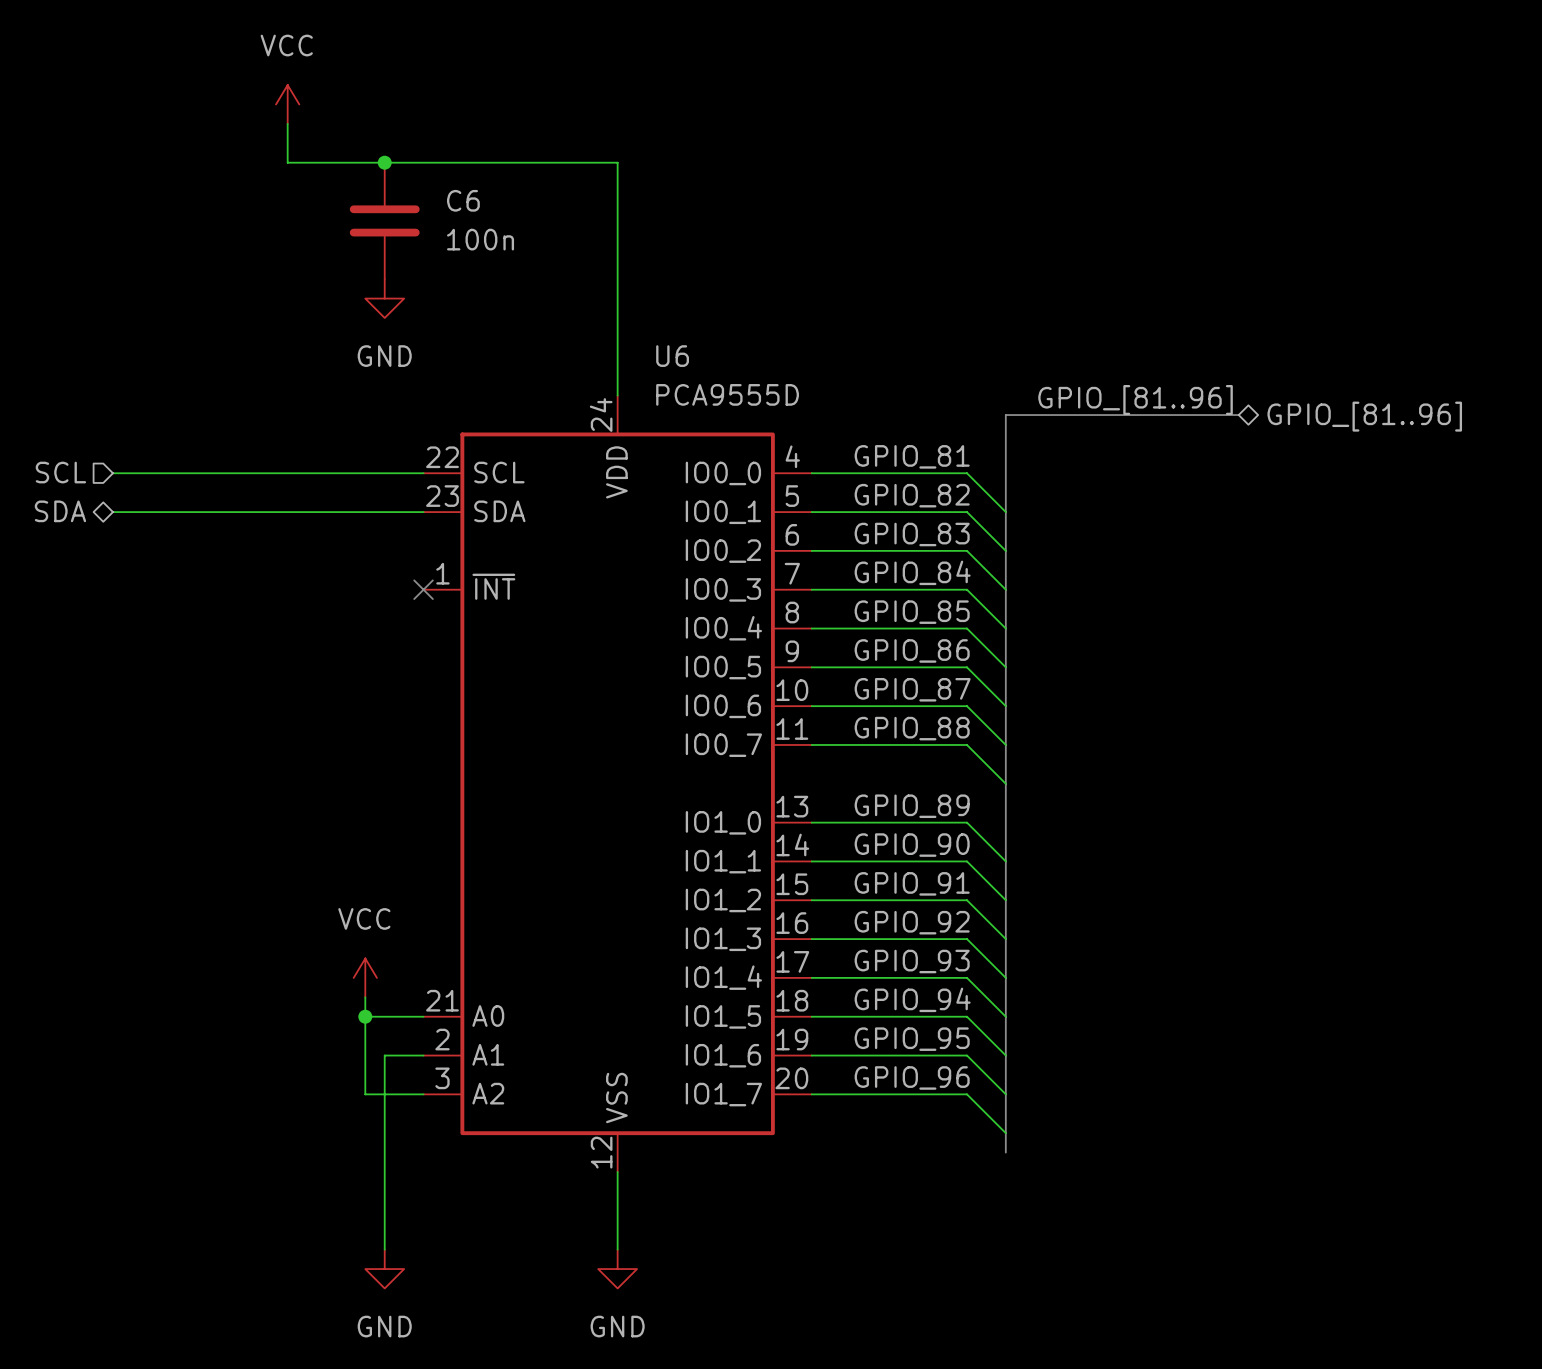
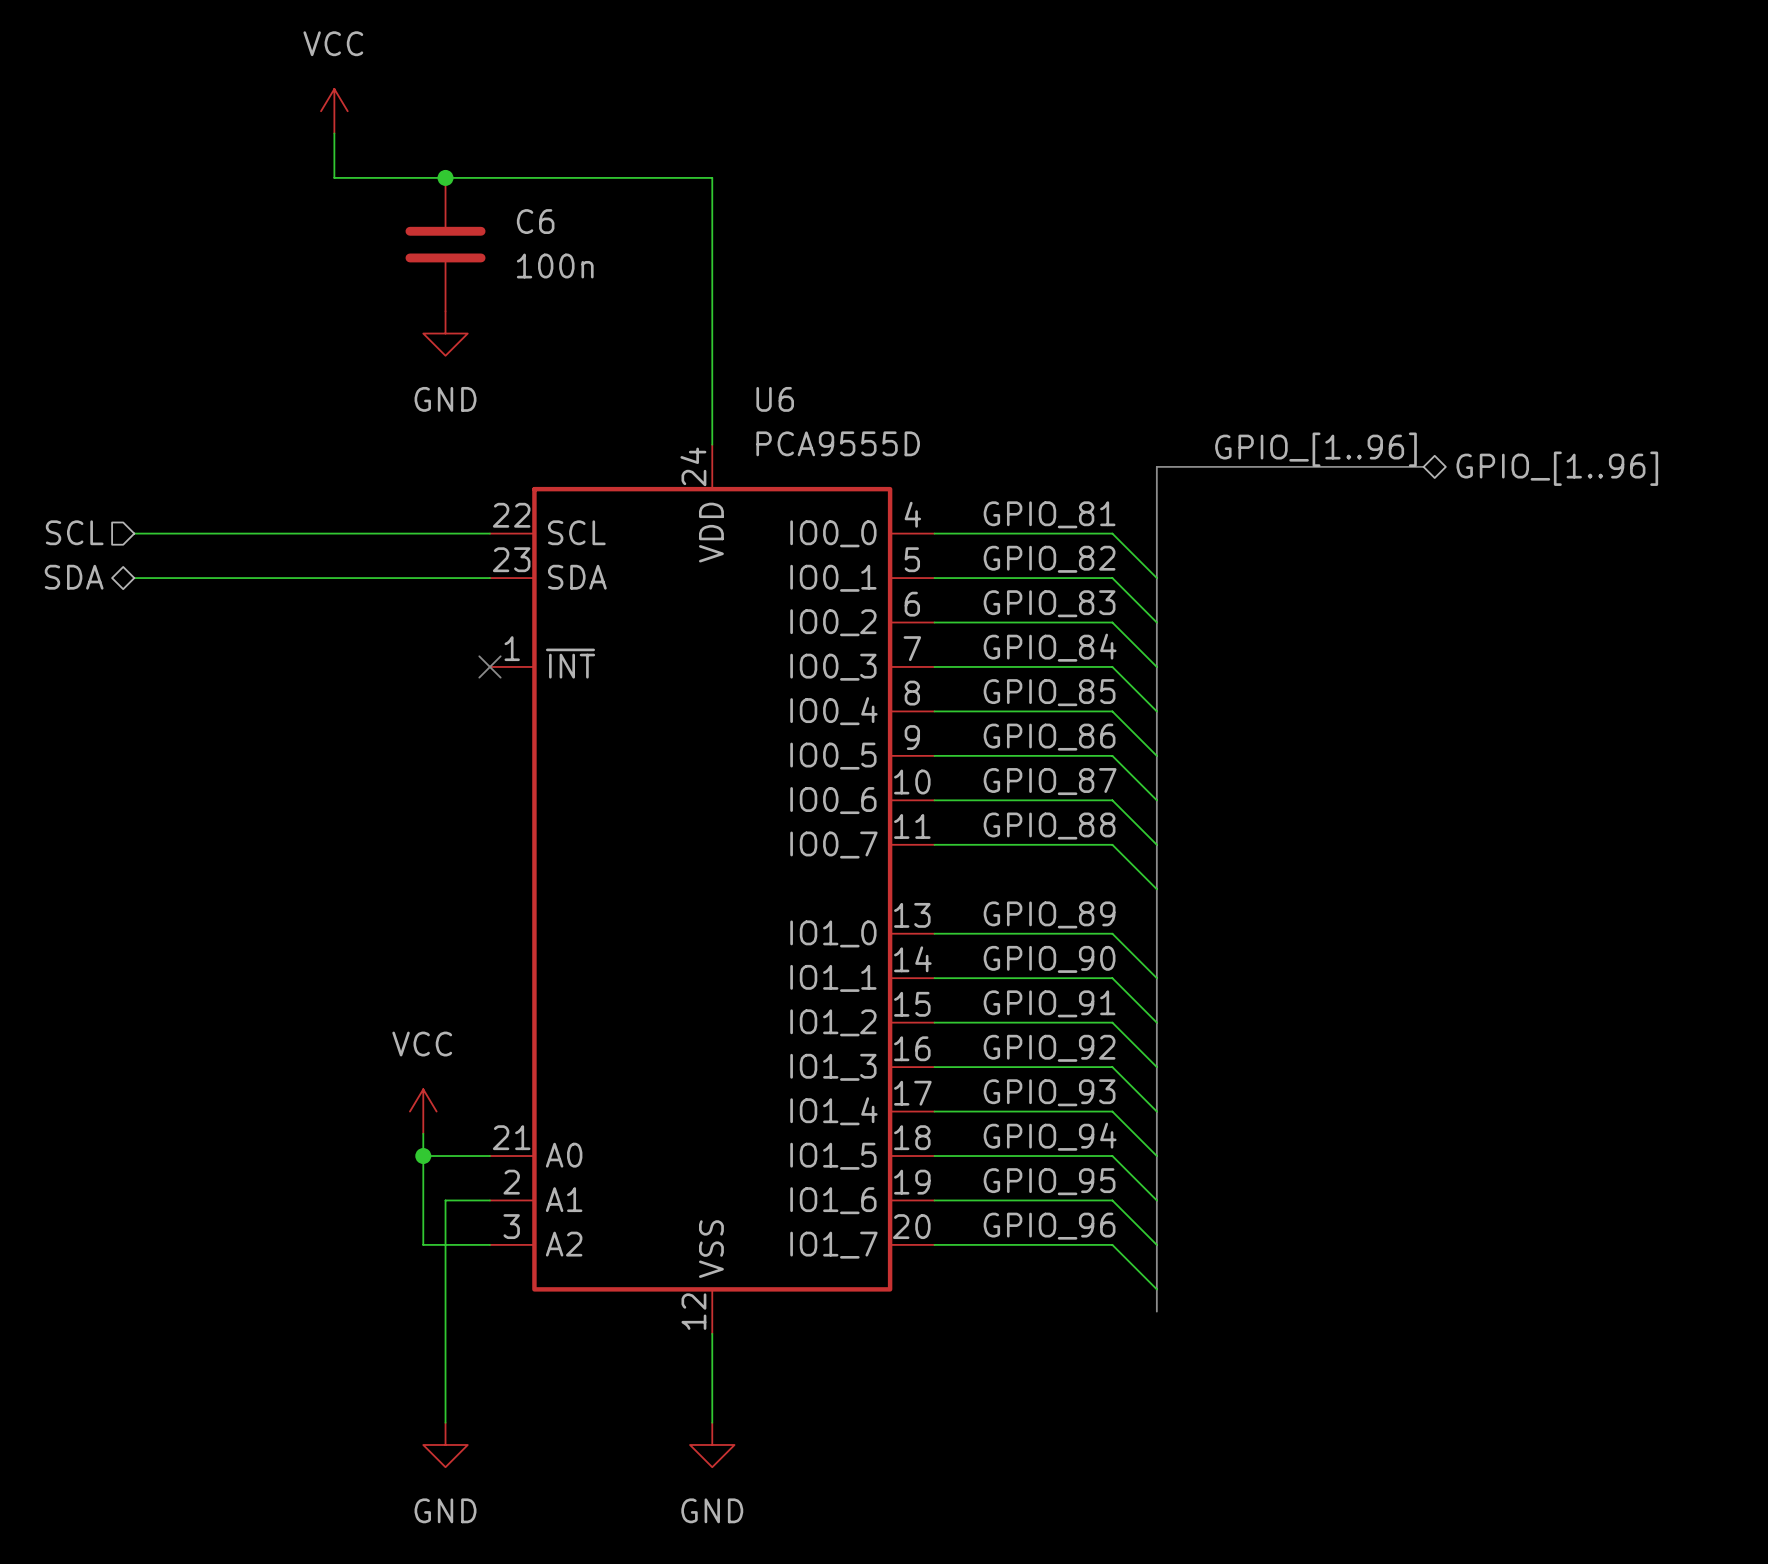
label: GPIO_[81..96] (1135, 400) -> GPIO_[1..96] (1315, 449)
hierarchical label: GPIO_[81..96] (1364, 416) -> GPIO_[1..96] (1557, 468)

